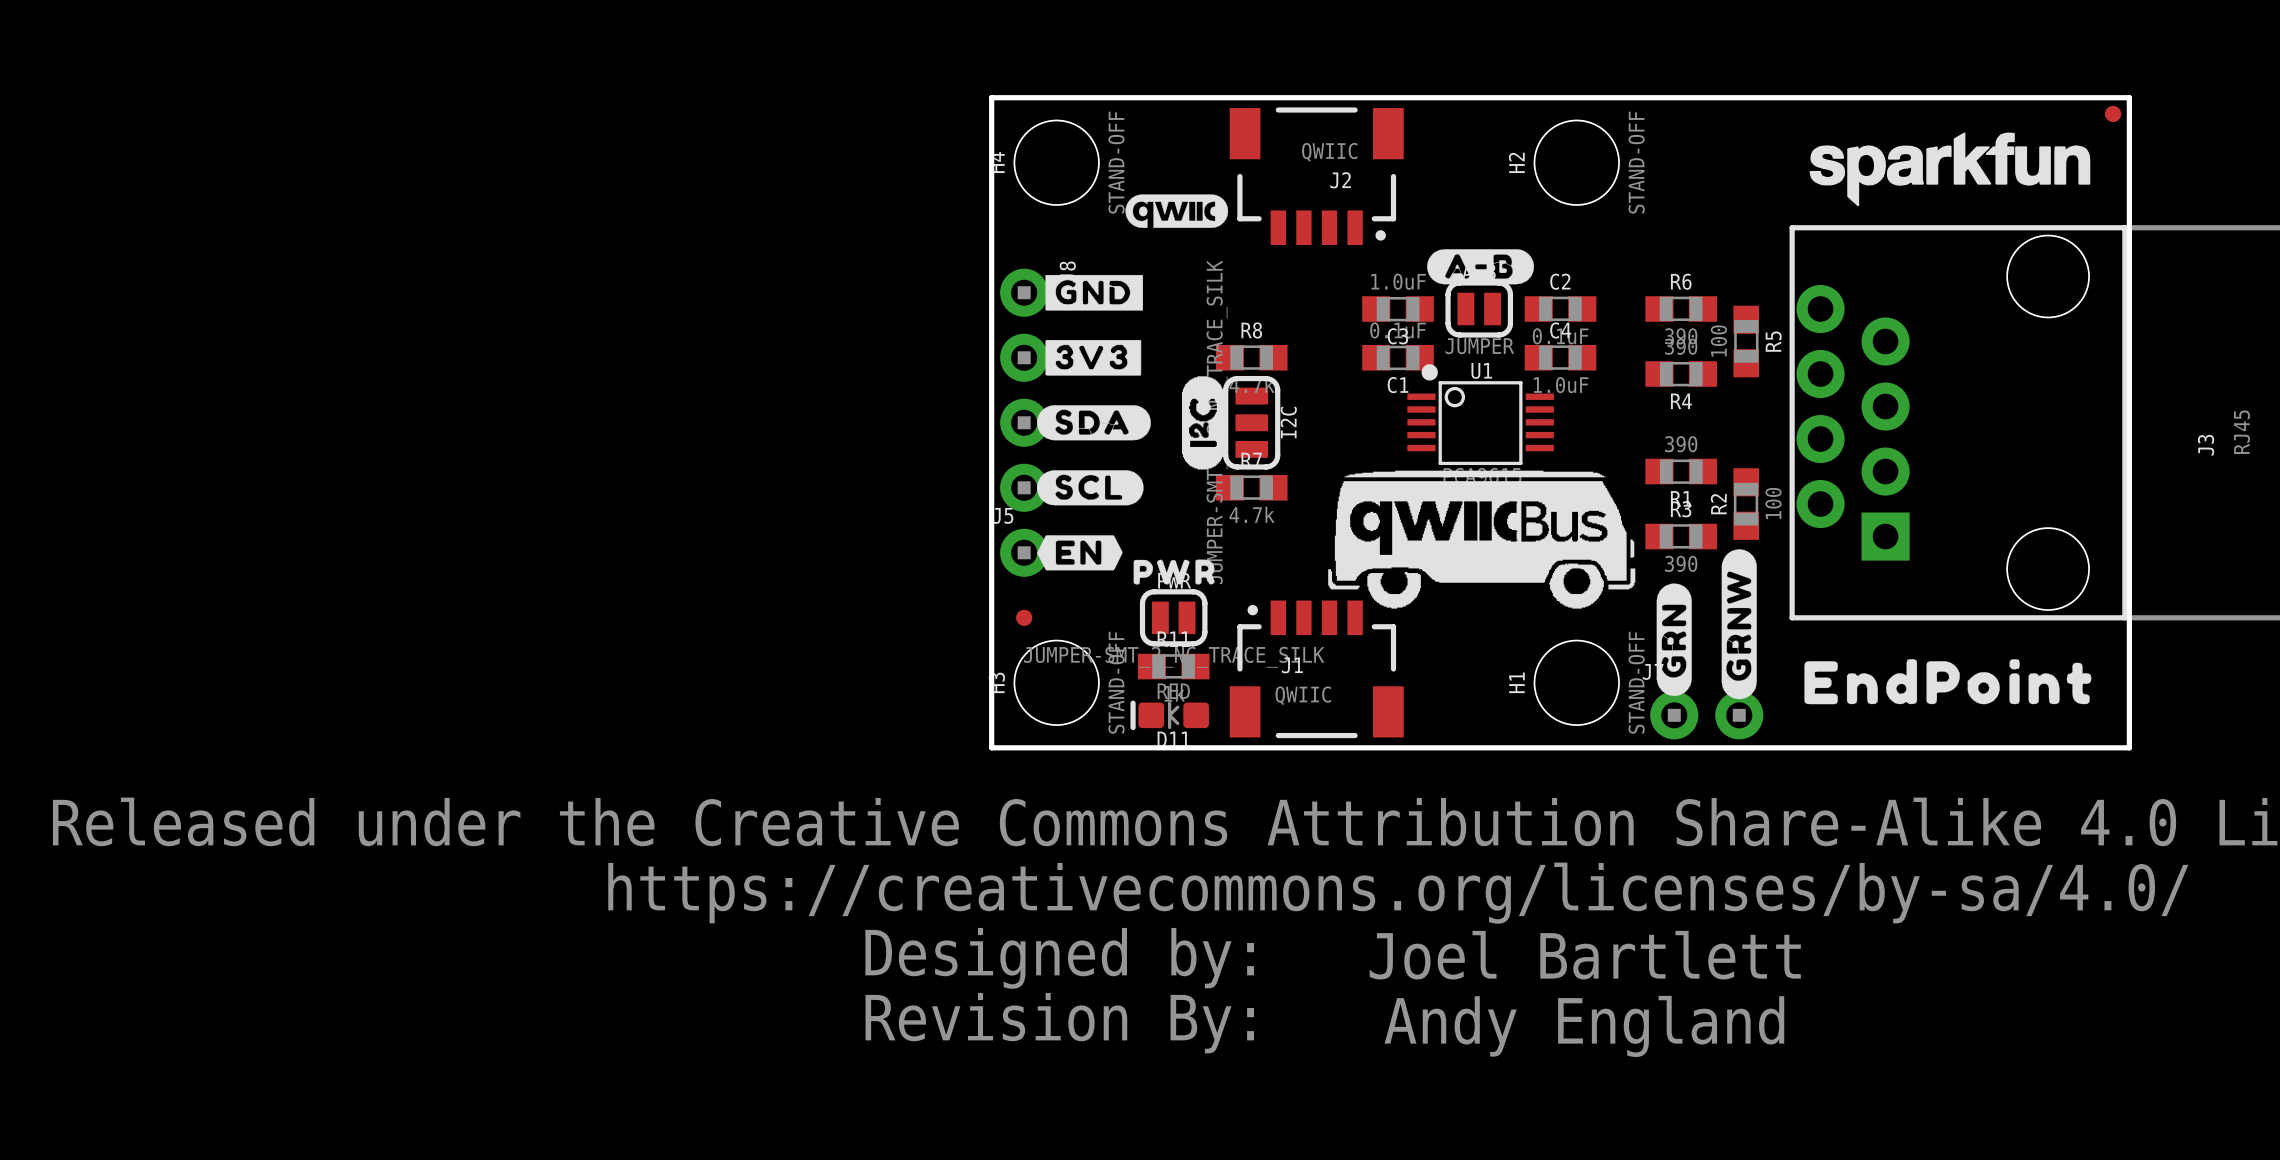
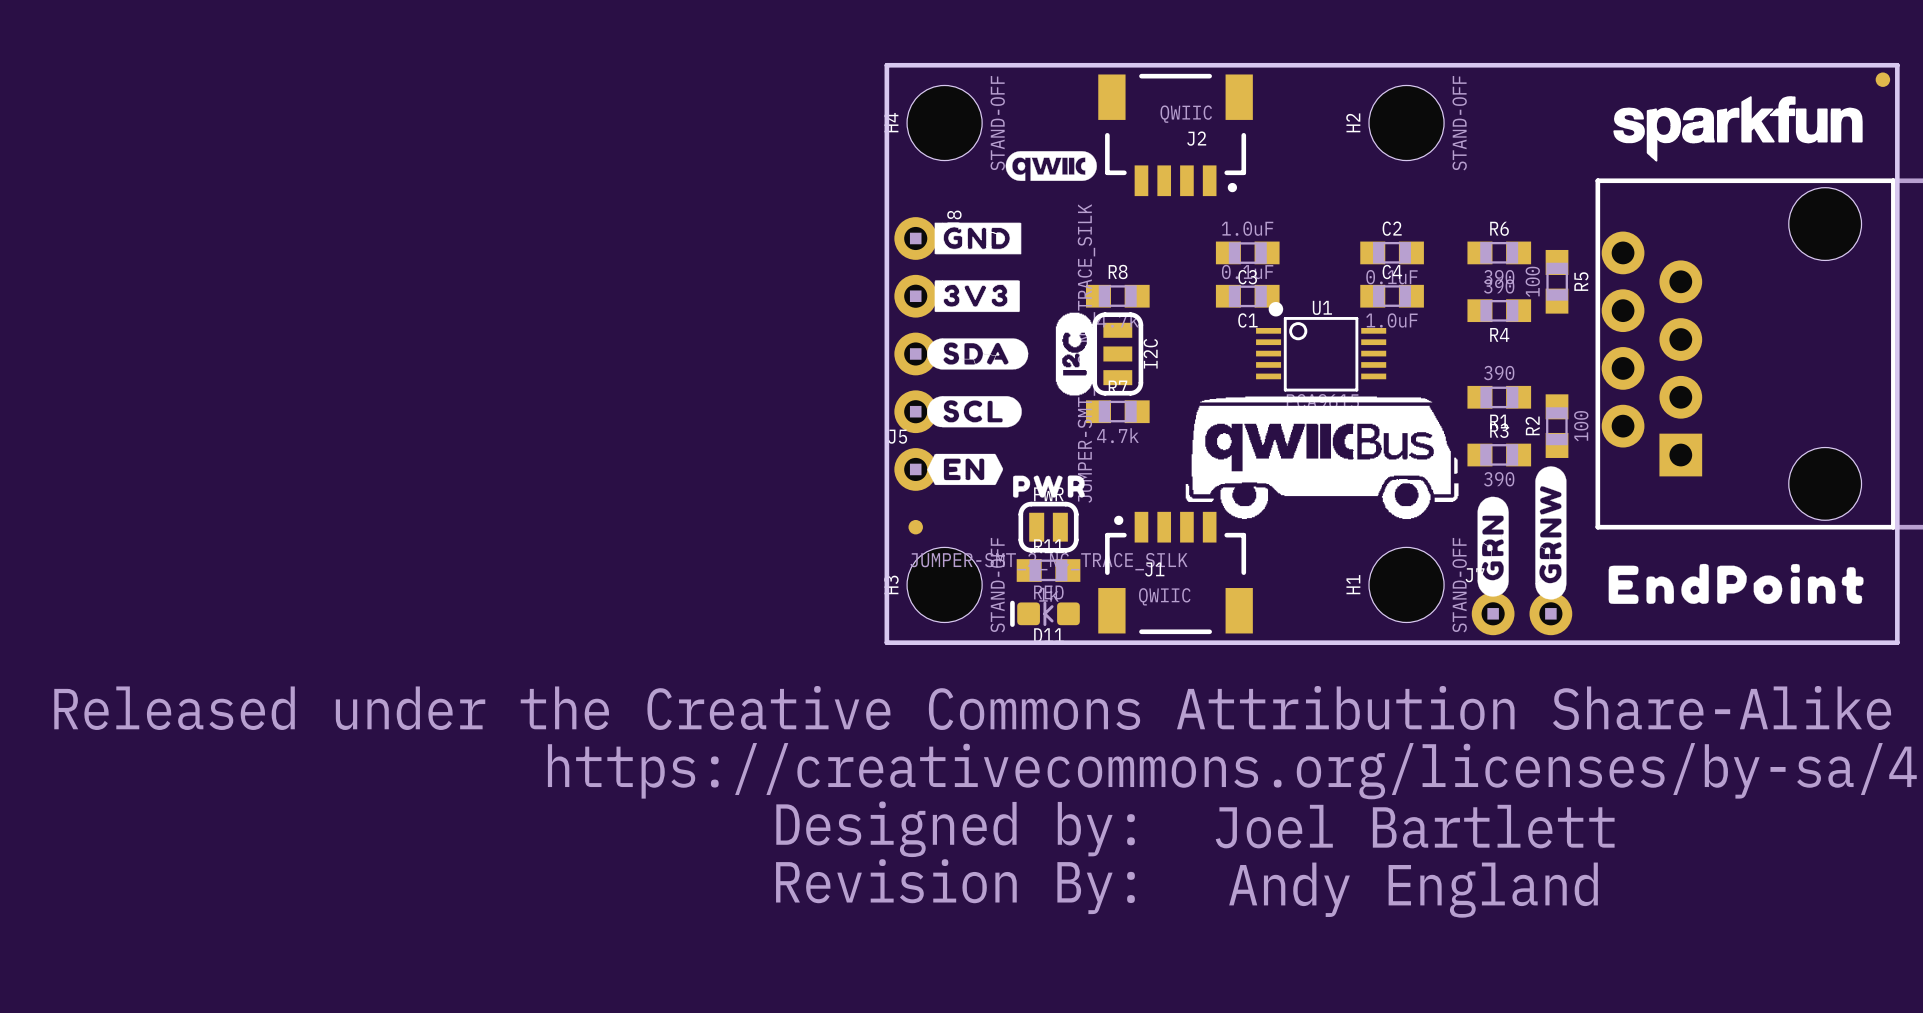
drawing: [1427, 249, 1535, 285] -> none
part: JUMPER (1479, 309) -> none

